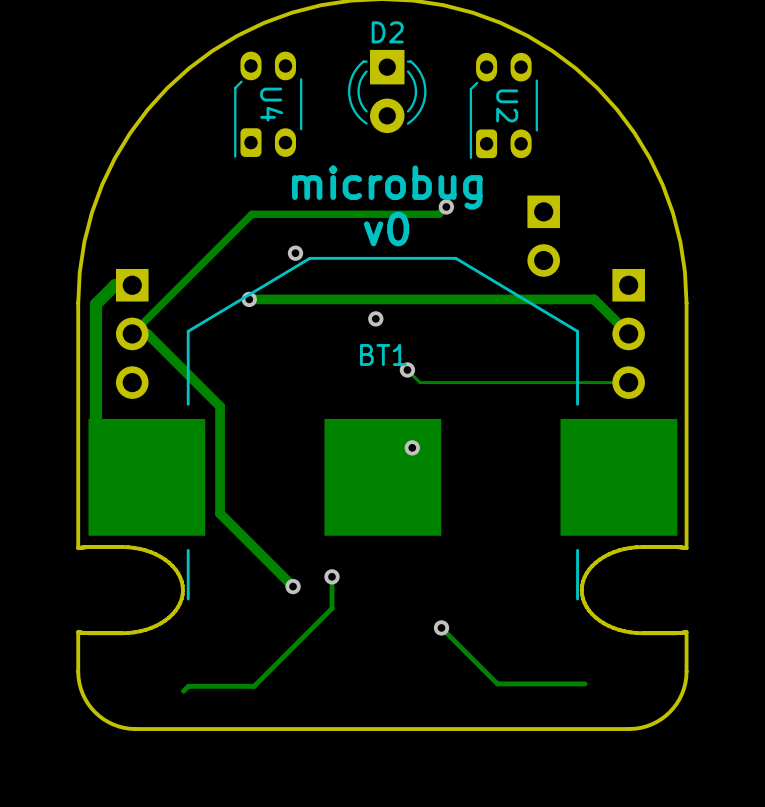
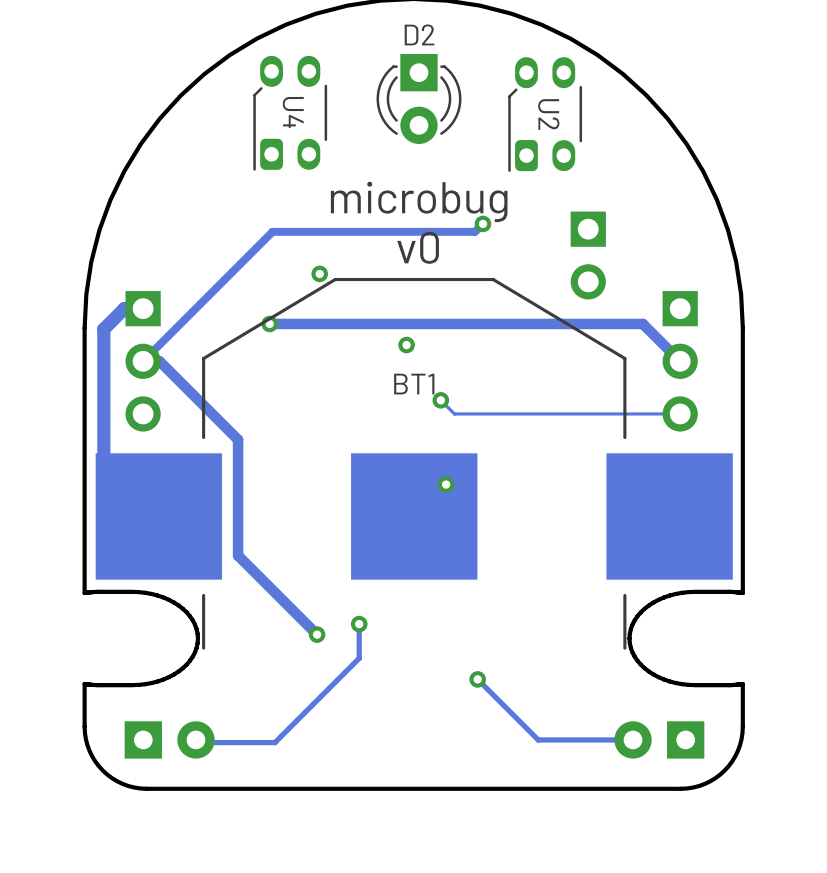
part: none -> (169, 739)
part: none -> (659, 739)

